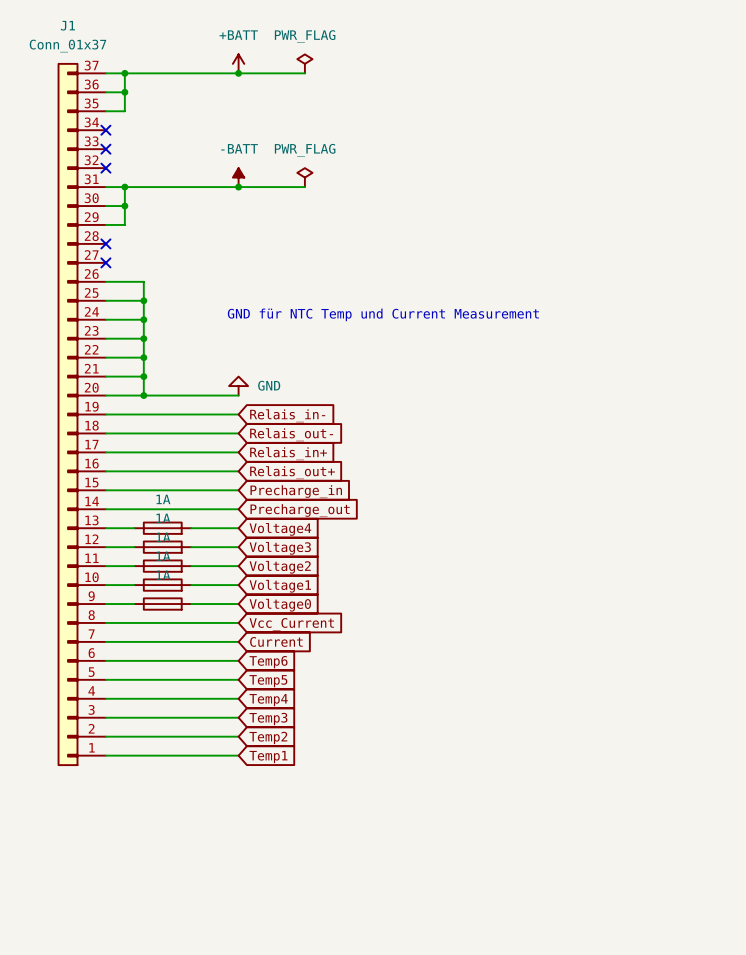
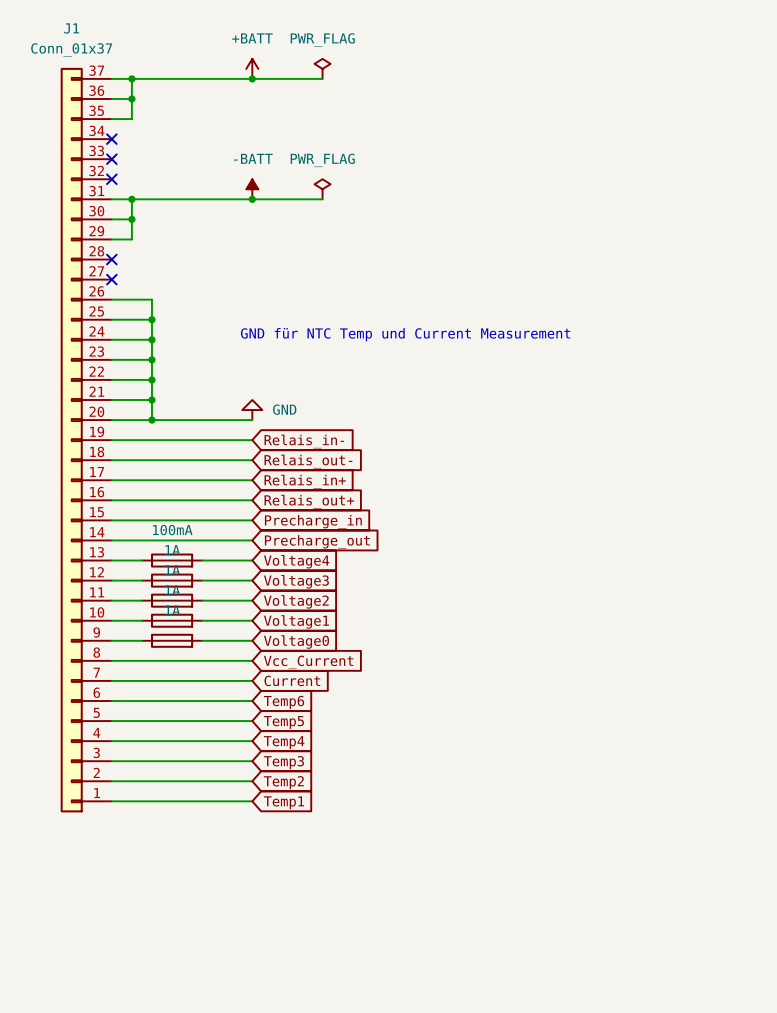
part value: 1A (163, 499) -> 100mA (172, 530)

